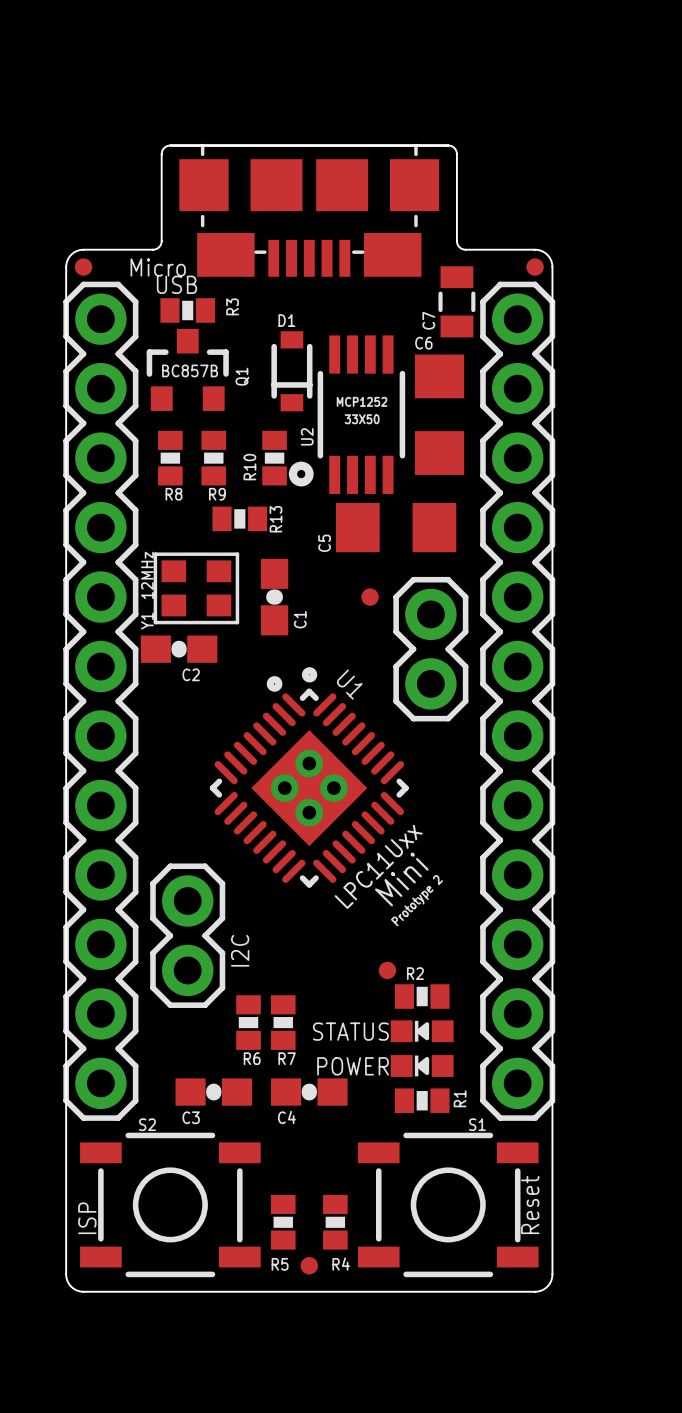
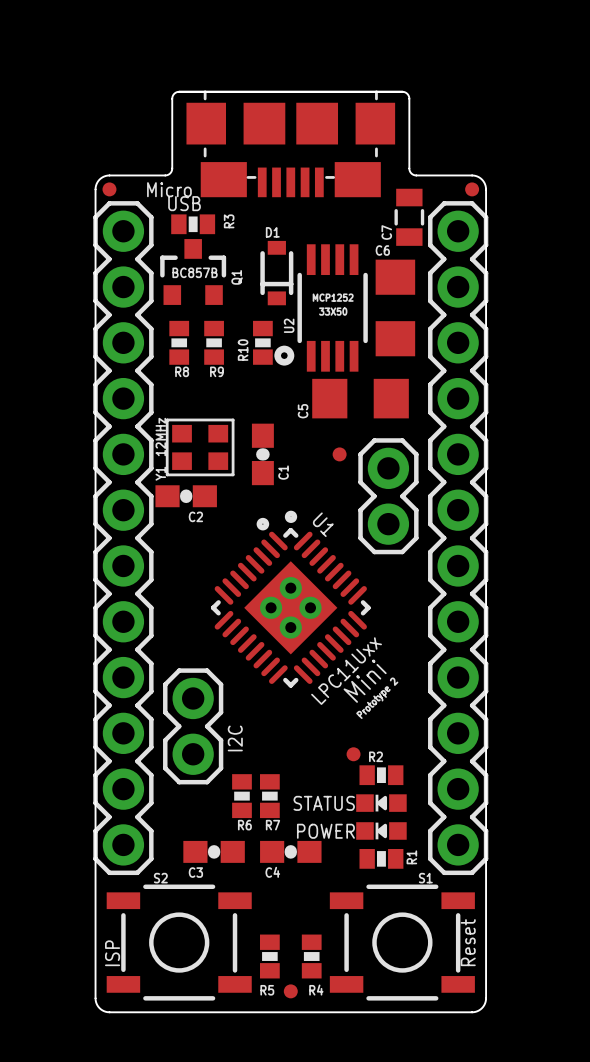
R13: (239, 518) -> none

